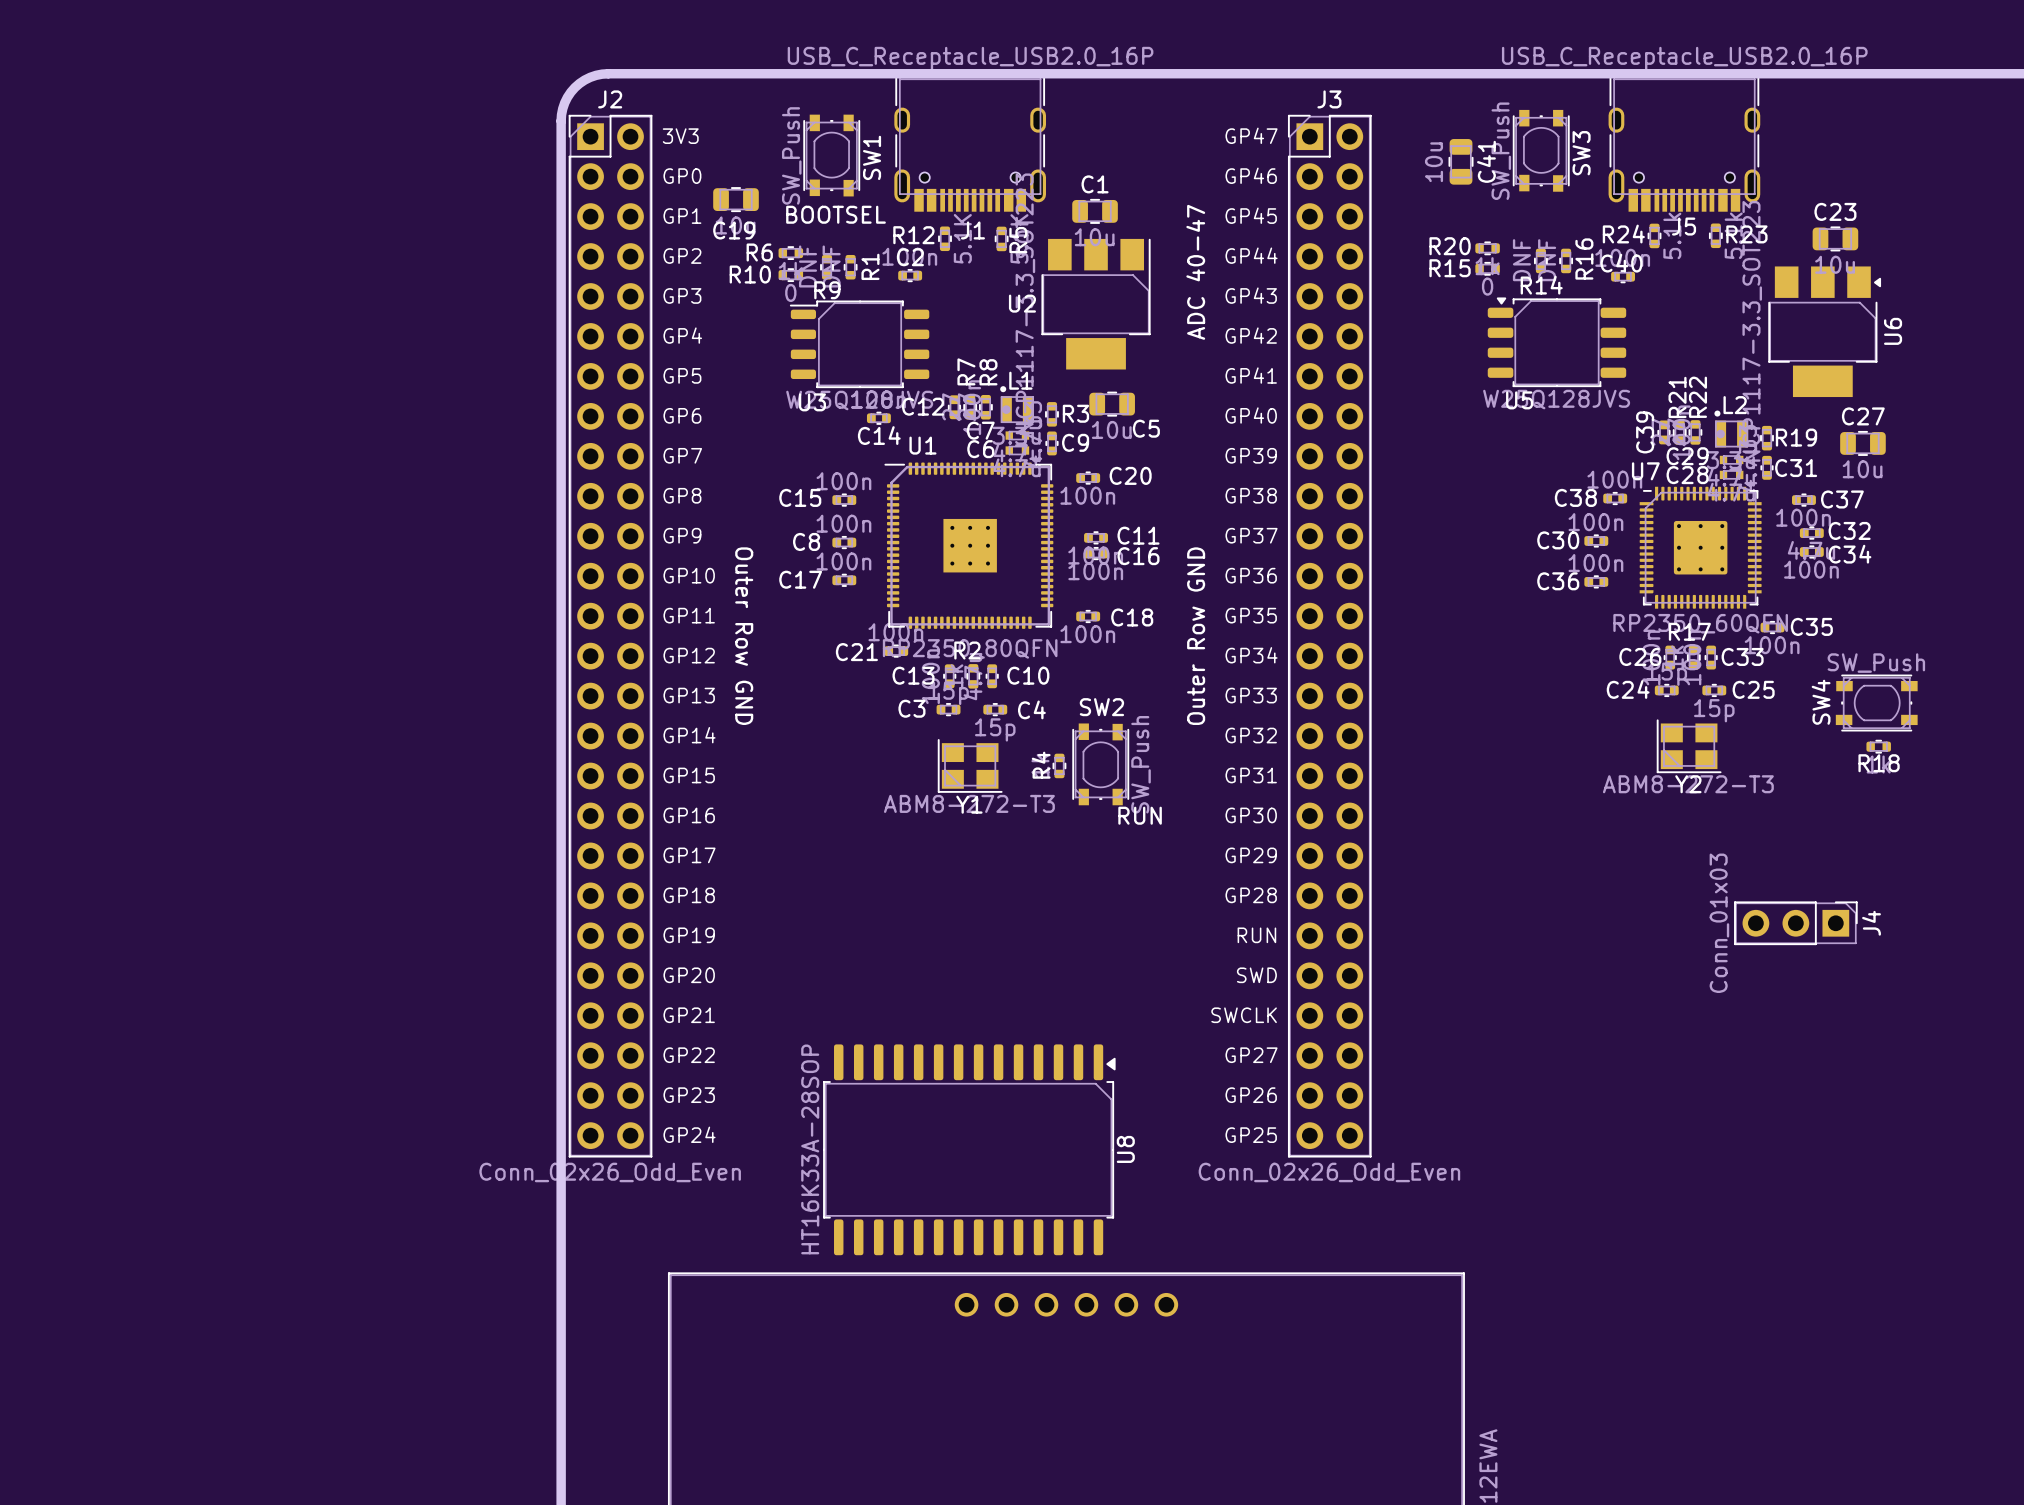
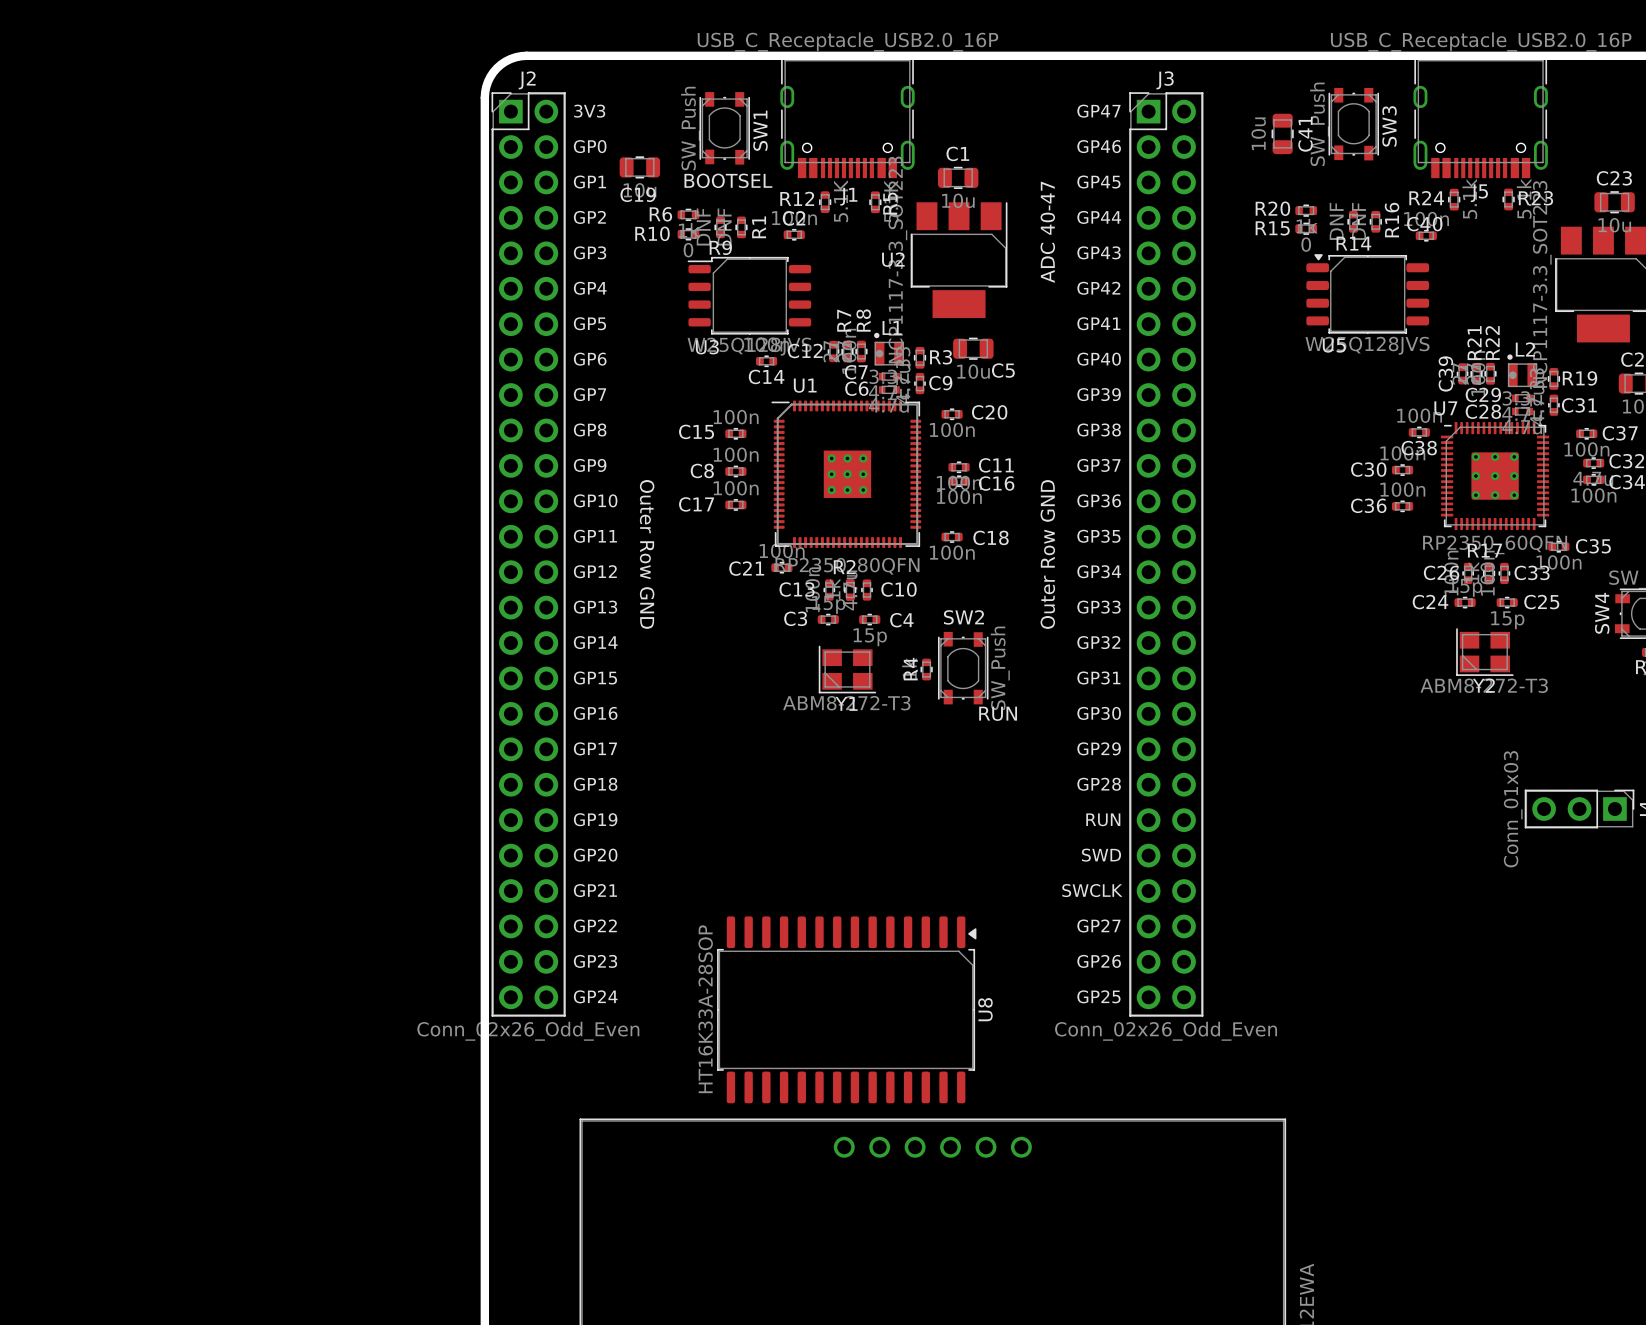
C38 name position: C38 (1575, 497) -> C38 (1419, 448)

